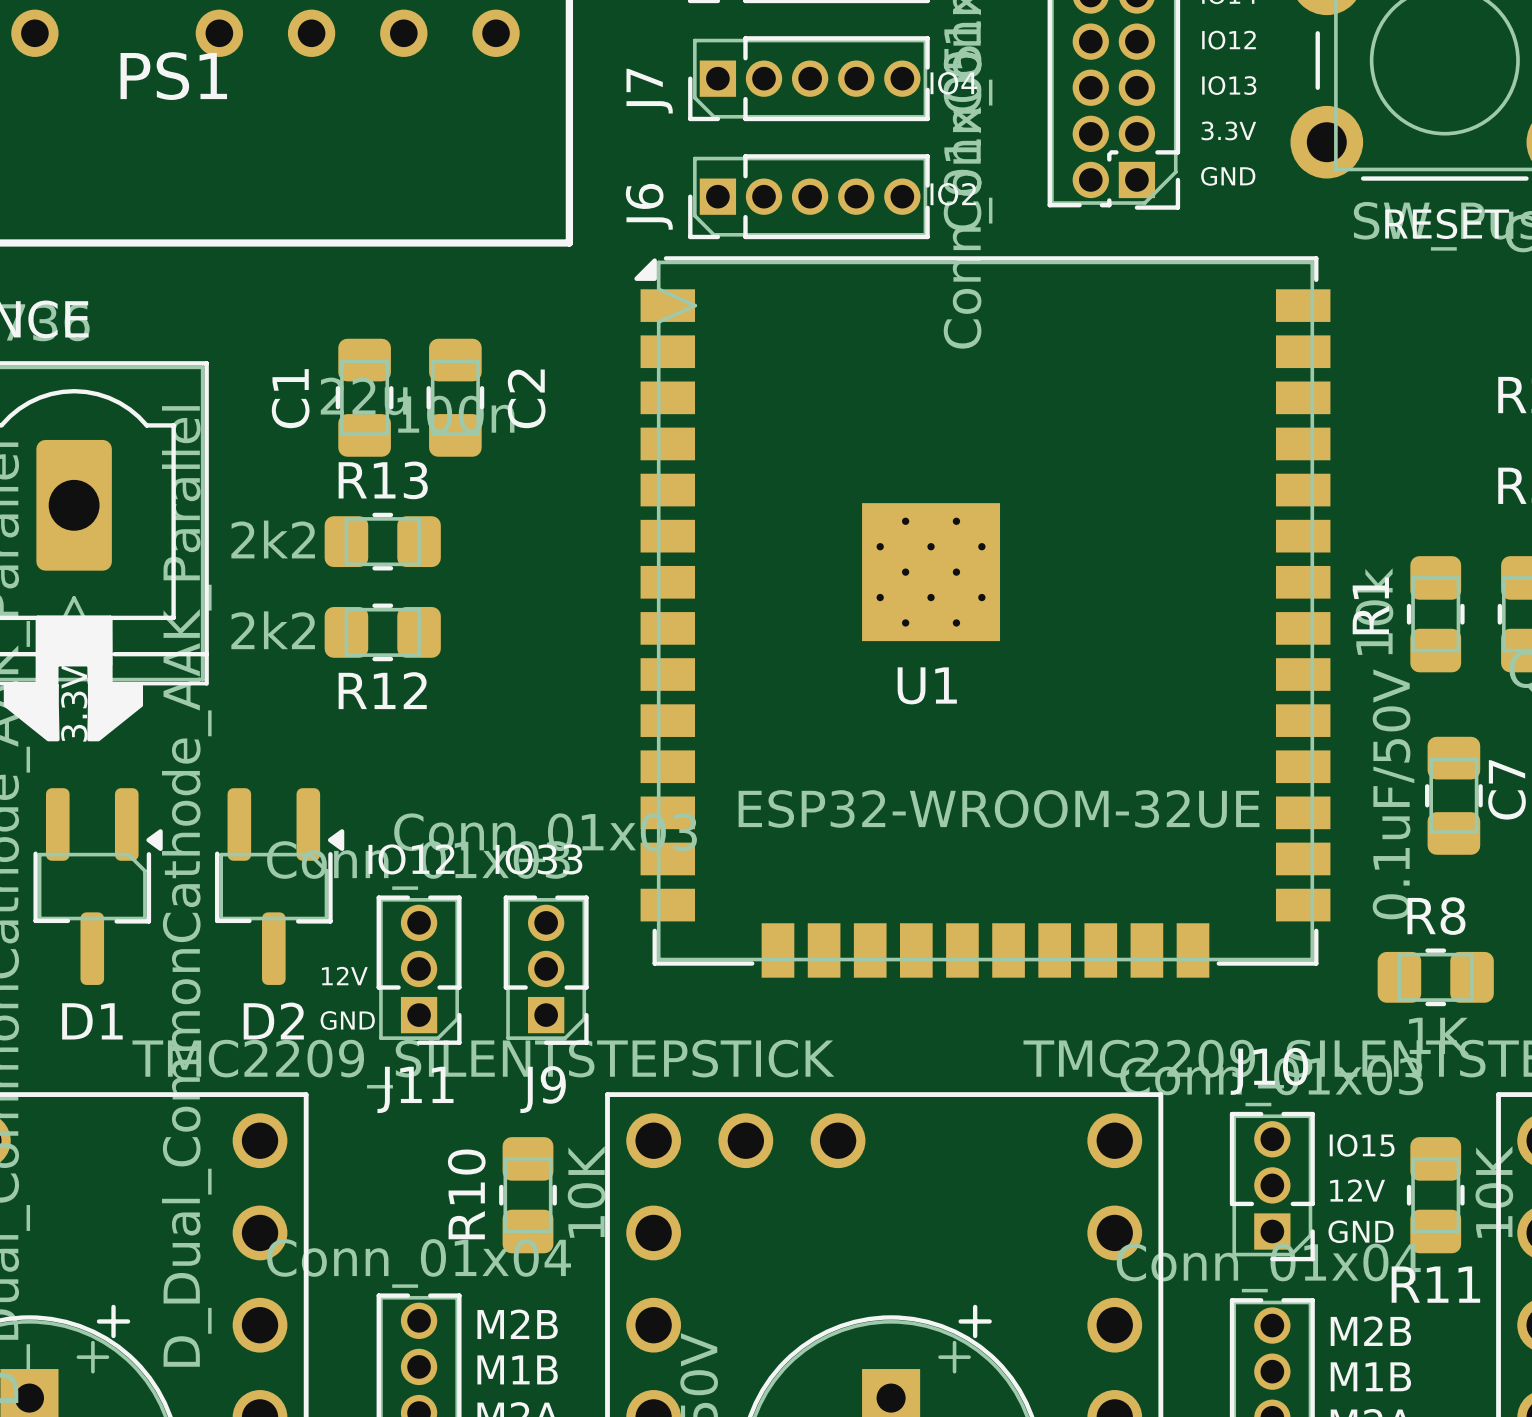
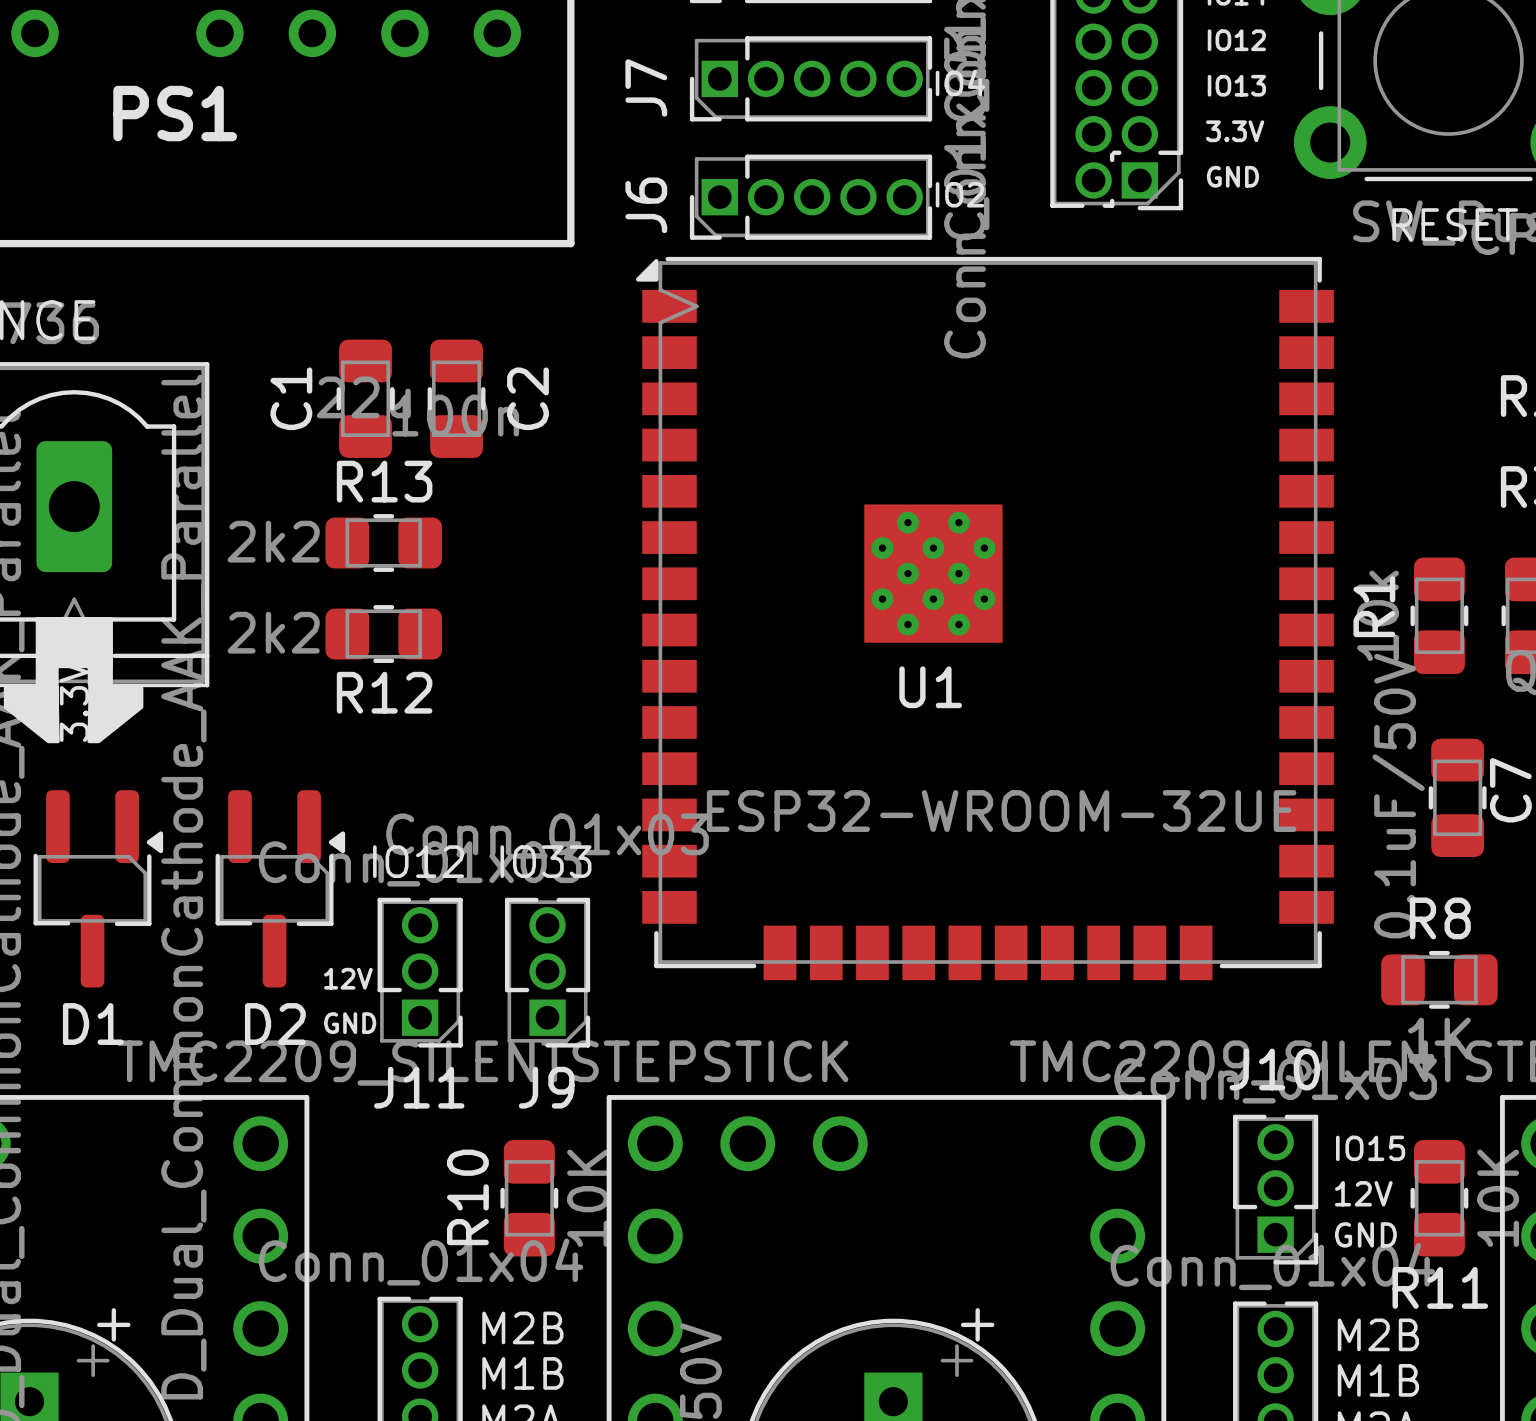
PS1 name position: PS1 (173, 76) -> PS1 (175, 113)

